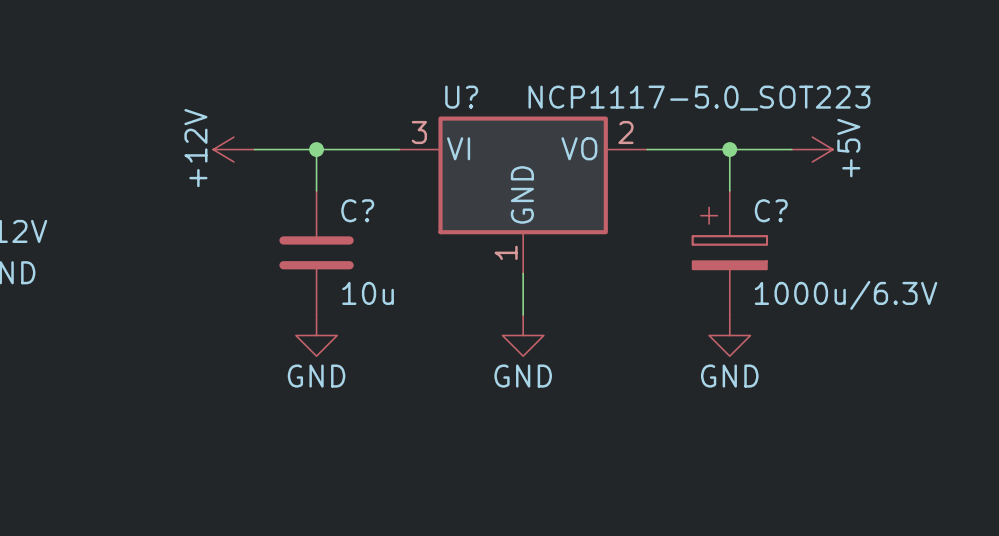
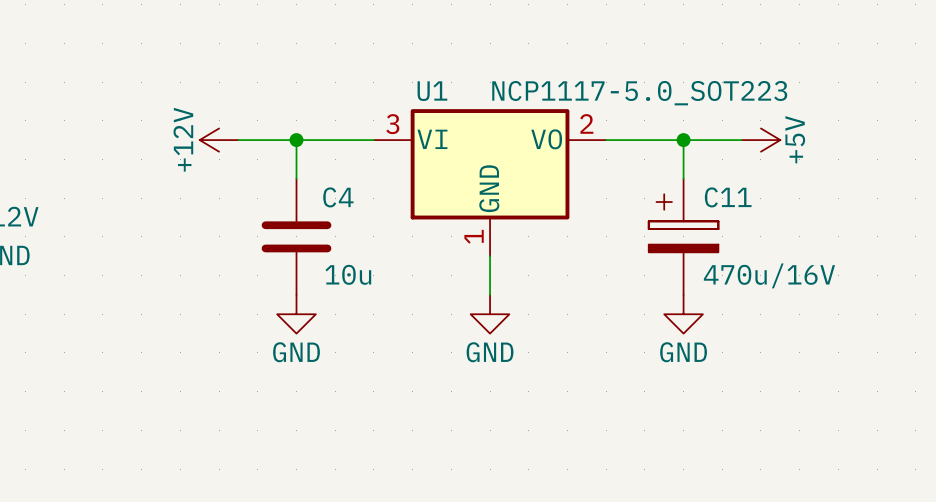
U? name: U? (461, 97) -> U1 (432, 91)
C? name: C? (357, 210) -> C4 (338, 197)
C? name: C? (771, 210) -> C11 (728, 197)
C? value: 1000u/6.3V (846, 295) -> 470u/16V (769, 275)

